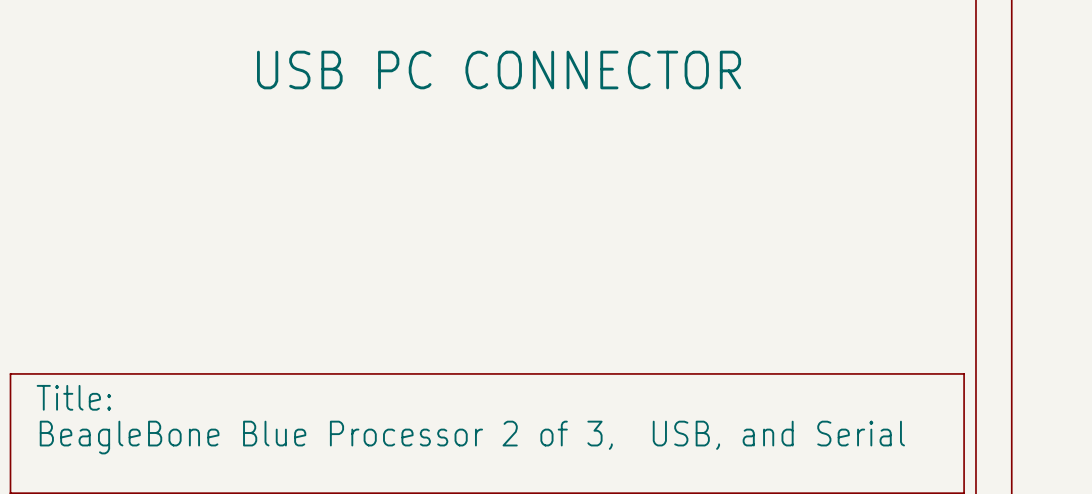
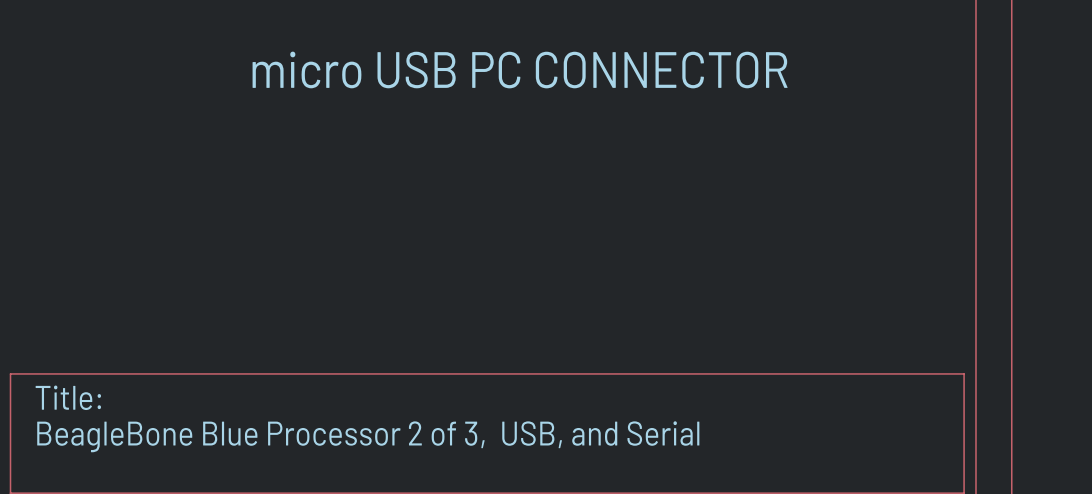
text: USB PC CONNECTOR (499, 70) -> micro USB PC CONNECTOR (520, 69)

